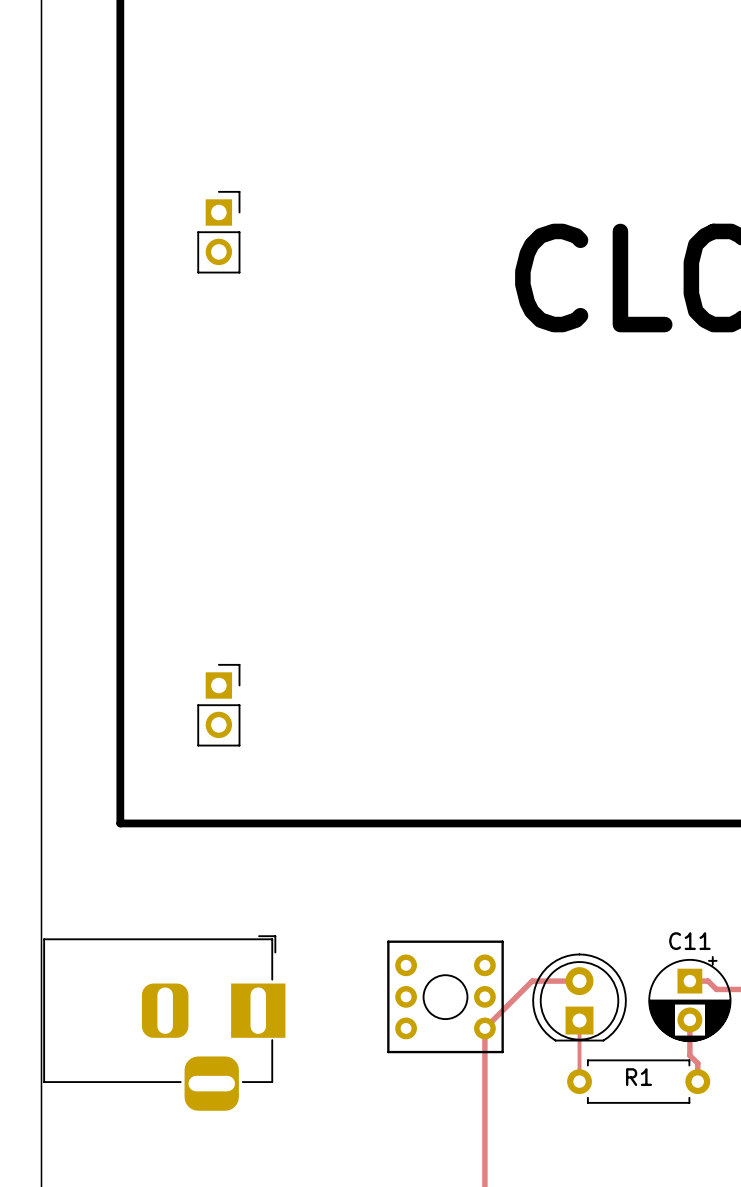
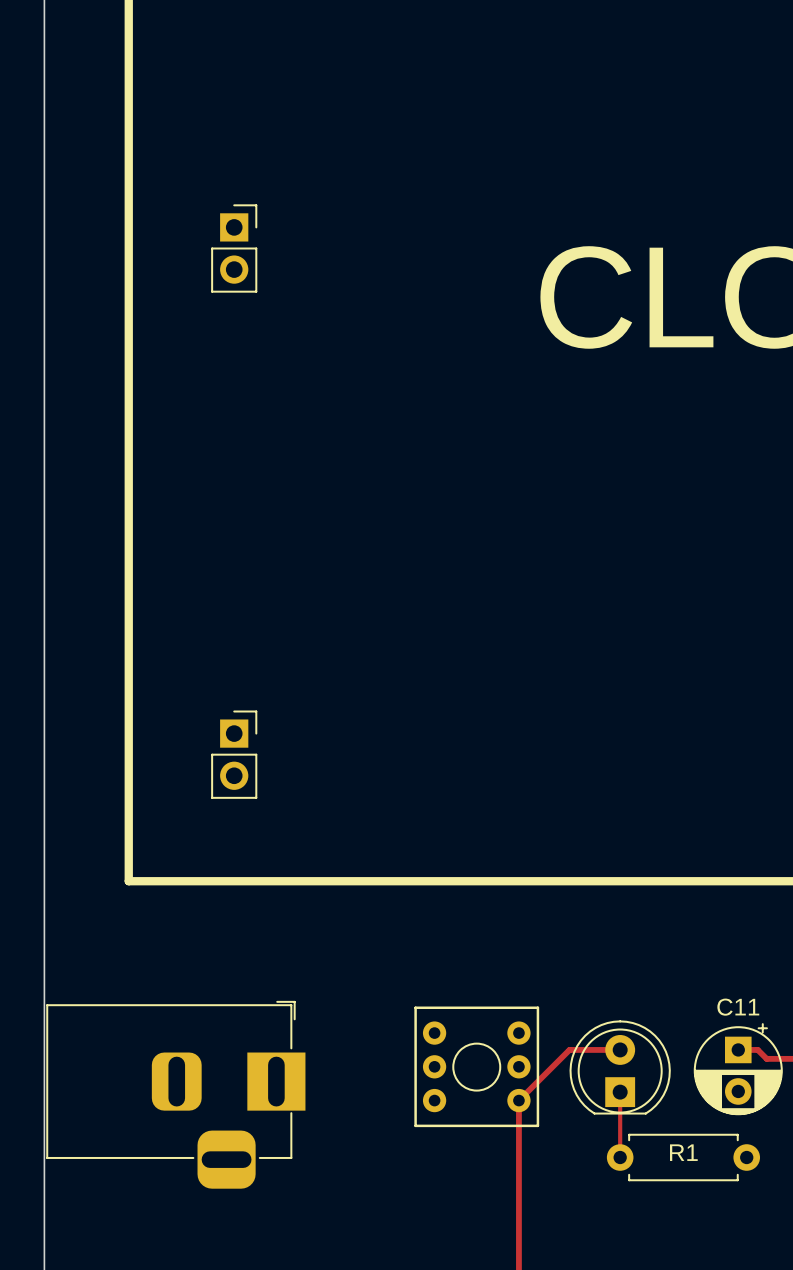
track: (689, 1019) (689, 1055) (697, 1063) (697, 1081) -> none

